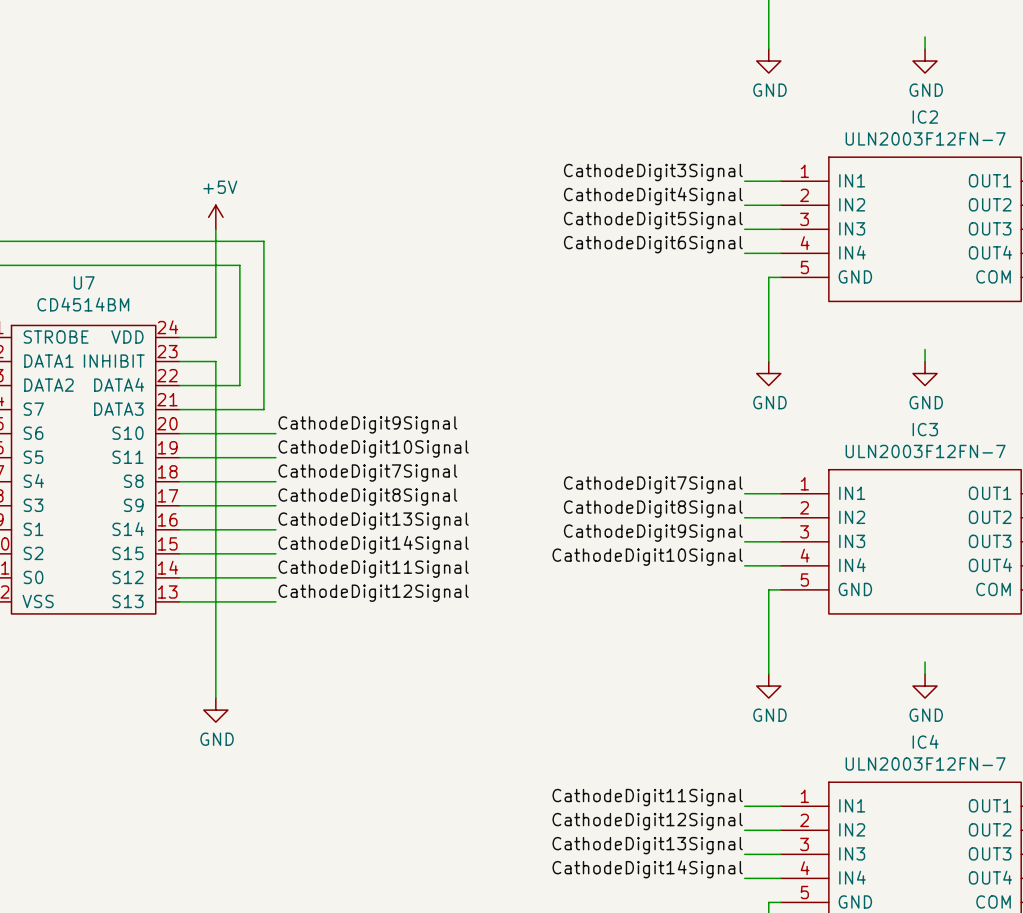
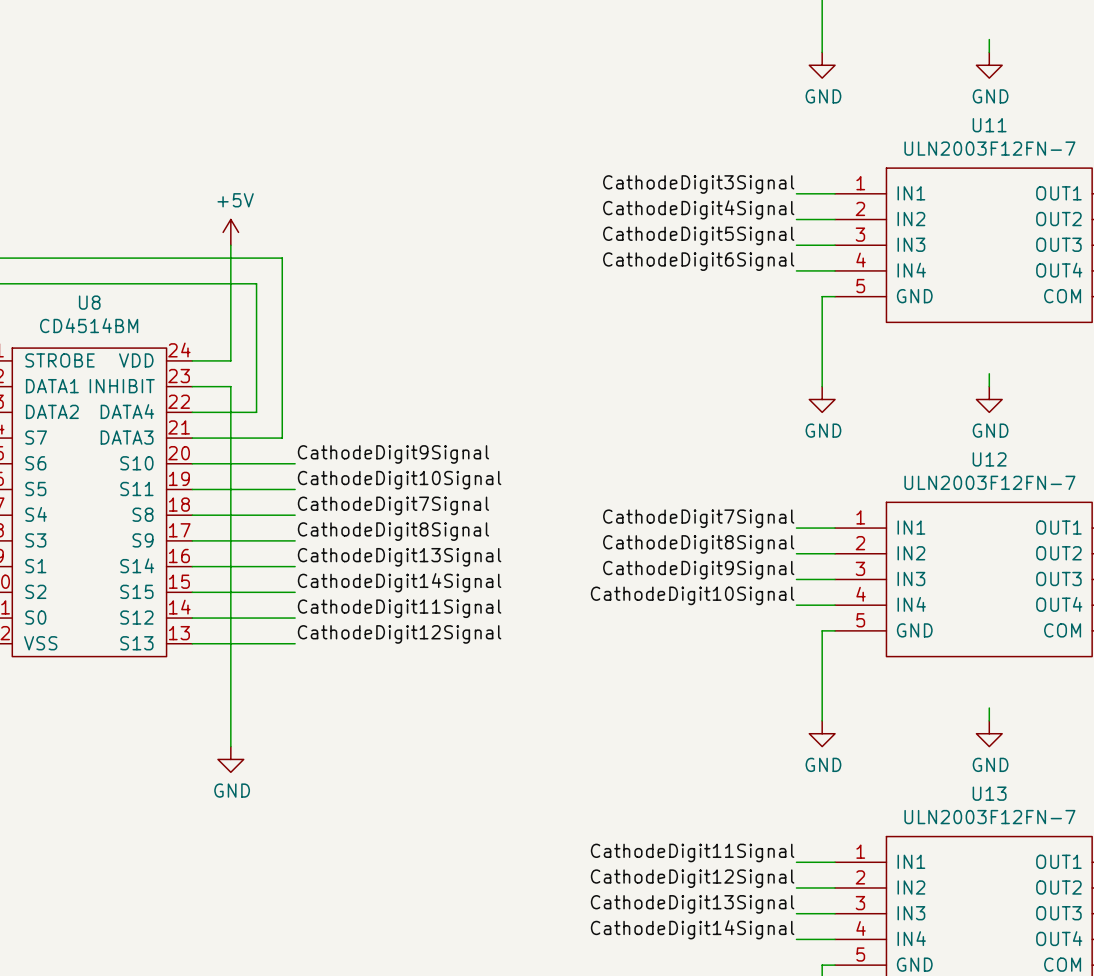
IC2 name: IC2 (925, 117) -> U11 (989, 125)
U7 name: U7 (84, 282) -> U8 (89, 302)
IC3 name: IC3 (925, 429) -> U12 (989, 459)
IC4 name: IC4 (925, 741) -> U13 (989, 793)

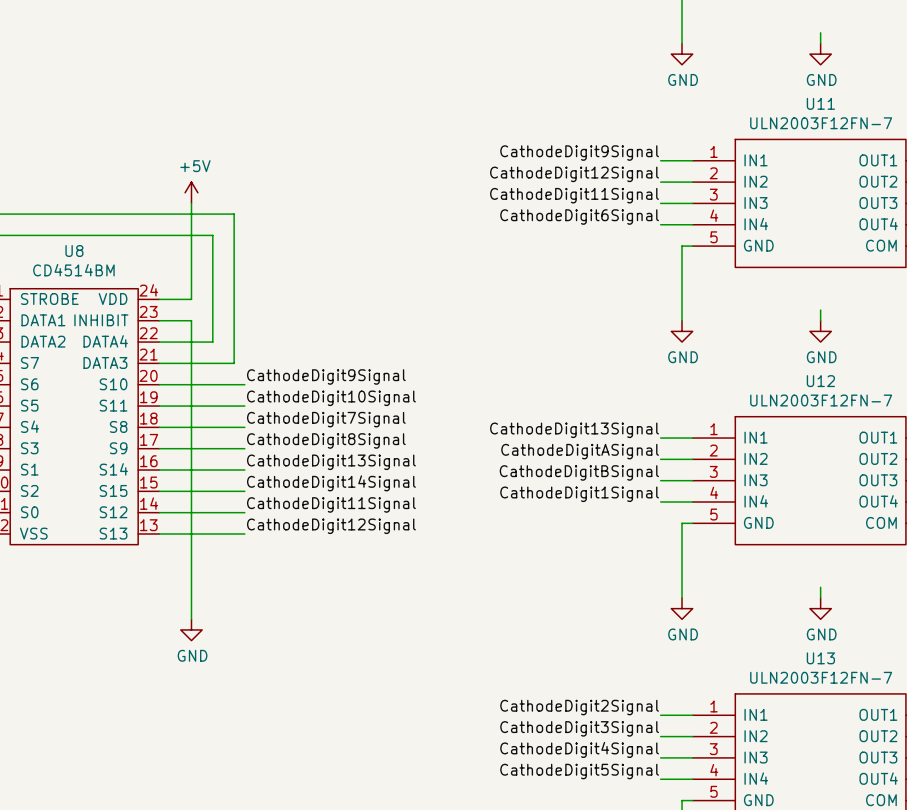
label: CathodeDigit3Signal (698, 184) -> CathodeDigit9Signal (579, 153)
label: CathodeDigit4Signal (698, 209) -> CathodeDigit12Signal (574, 174)
label: CathodeDigit5Signal (698, 235) -> CathodeDigit11Signal (574, 195)
label: CathodeDigit7Signal (698, 518) -> CathodeDigit13Signal (574, 430)
label: CathodeDigit8Signal (698, 544) -> CathodeDigitASignal (580, 451)
label: CathodeDigit9Signal (698, 570) -> CathodeDigitBSignal (579, 472)
label: CathodeDigit10Signal (692, 595) -> CathodeDigit1Signal (579, 494)
label: CathodeDigit11Signal (692, 852) -> CathodeDigit2Signal (579, 707)
label: CathodeDigit12Signal (692, 878) -> CathodeDigit3Signal (579, 728)
label: CathodeDigit13Signal (692, 904) -> CathodeDigit4Signal (579, 749)
label: CathodeDigit14Signal (692, 929) -> CathodeDigit5Signal (579, 771)

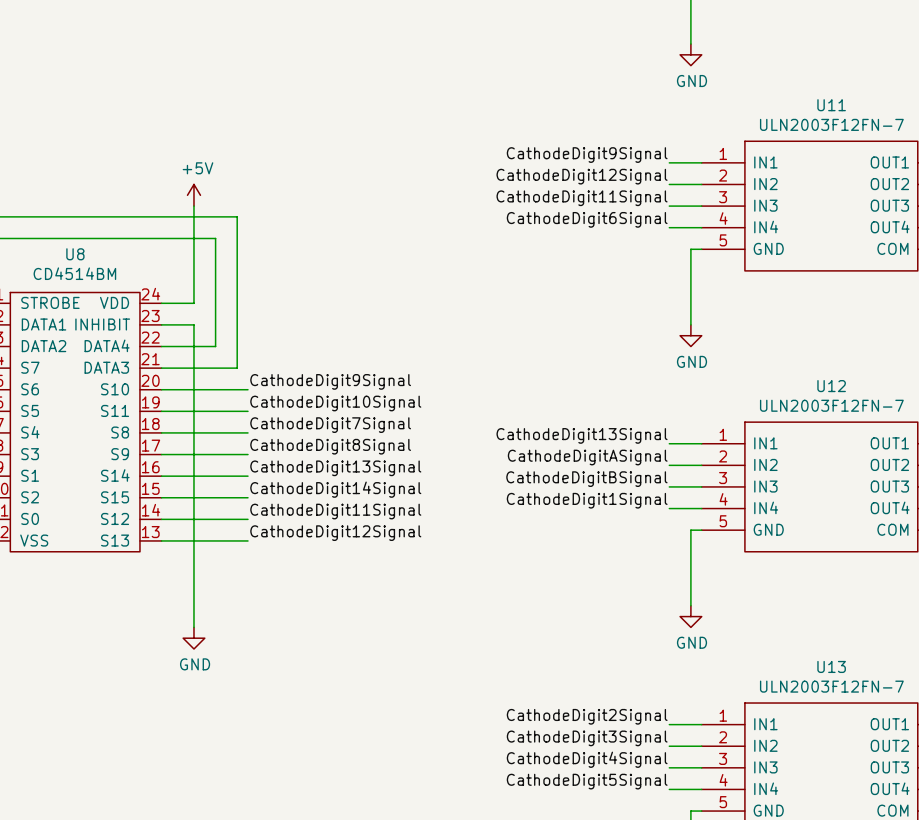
wire: (820, 32) (820, 43) -> none
power symbol: GND (820, 54) -> none
wire: (820, 310) (820, 320) -> none
power symbol: GND (820, 331) -> none
wire: (820, 587) (820, 597) -> none
power symbol: GND (820, 608) -> none

